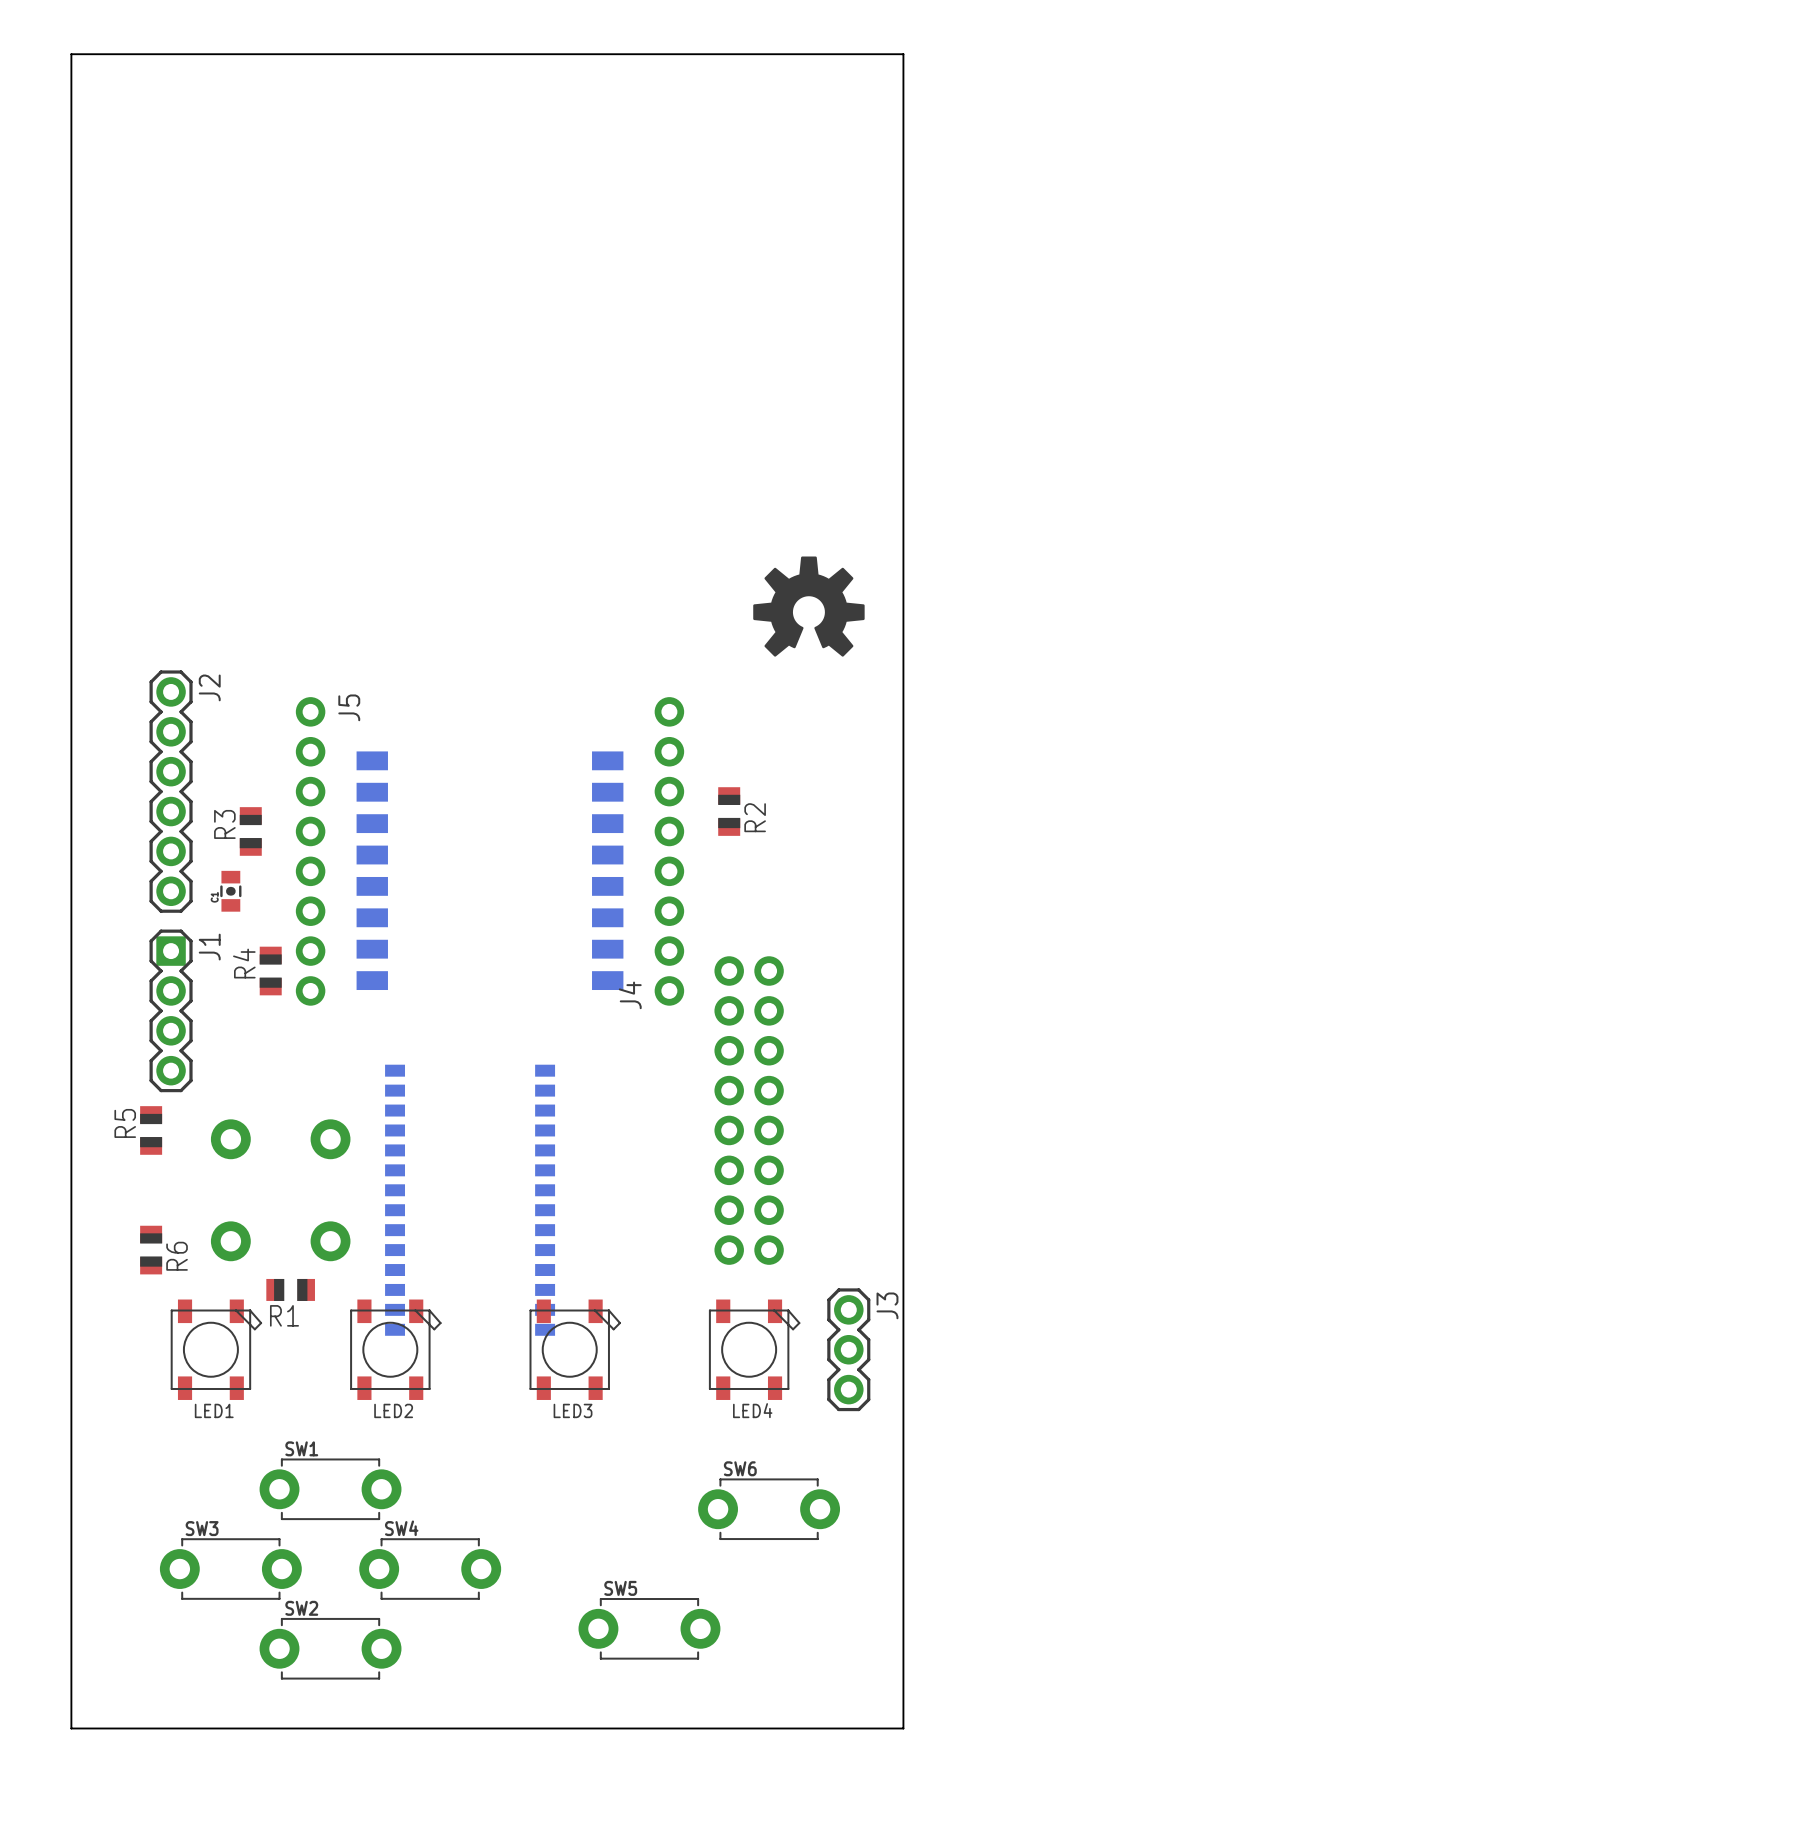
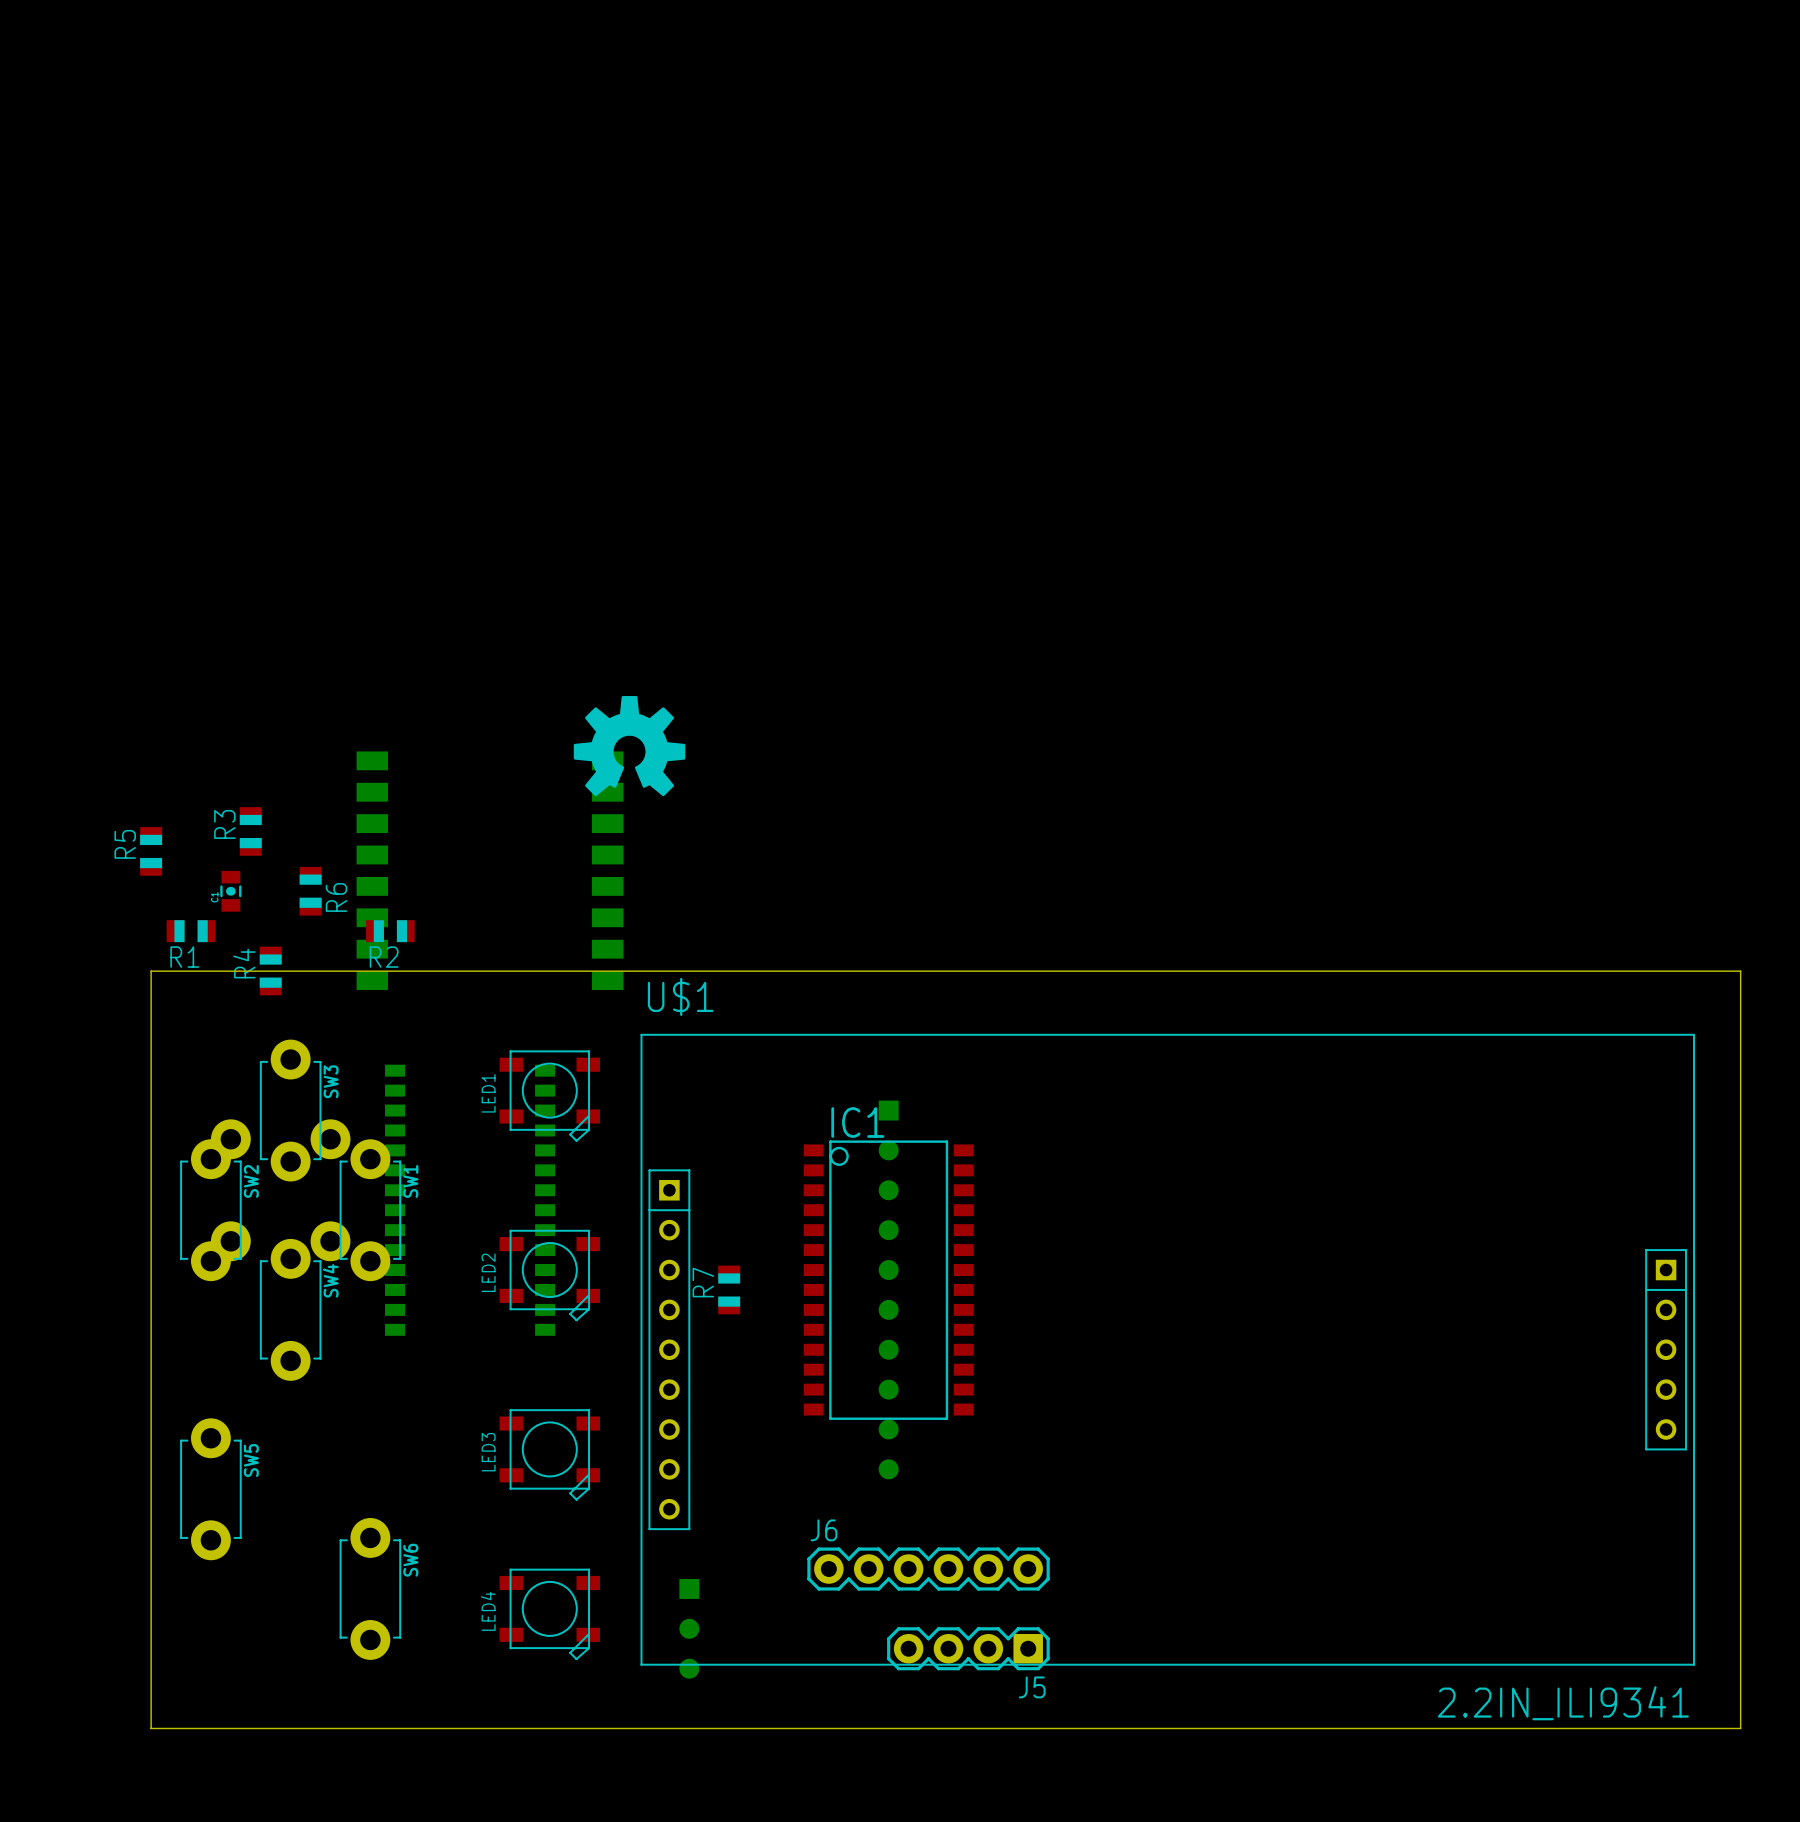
drawing position: (808, 606) -> (629, 746)
J5 footprint: [295, 697, 326, 1006] -> [887, 1627, 1050, 1671]
J5 name position: J5 (349, 707) -> J5 (1032, 1687)
J2: (171, 791) -> none
R2 rotation: 0° (729, 811) -> 90° clockwise (390, 931)
R2 position: (729, 811) -> (390, 931)
J4: (669, 851) -> none
J1: (171, 1010) -> none
part: (729, 1110) -> none
part: (769, 1110) -> none
R5 position: (151, 1130) -> (151, 851)
R6 position: (151, 1250) -> (310, 891)
IC1: none -> (888, 1280)
R1 position: (290, 1289) -> (190, 931)
R7: none -> (729, 1289)
part: none -> (888, 1289)
LED1 rotation: 0° (216, 1349) -> 90° clockwise (549, 1096)
LED1 position: (216, 1349) -> (549, 1096)
LED2 rotation: 0° (395, 1349) -> 90° clockwise (549, 1275)
LED2 position: (395, 1349) -> (549, 1275)
LED3 rotation: 0° (575, 1349) -> 90° clockwise (549, 1454)
LED3 position: (575, 1349) -> (549, 1454)
LED4 rotation: 0° (754, 1349) -> 90° clockwise (549, 1614)
LED4 position: (754, 1349) -> (549, 1614)
J3: (848, 1349) -> none
U$1: none -> 2.2IN_ILI9341 (1167, 1349)
SW1 rotation: 0° (330, 1489) -> 90° clockwise (370, 1210)
SW1 position: (330, 1489) -> (370, 1210)
SW6 rotation: 0° (769, 1509) -> 90° clockwise (370, 1588)
SW6 position: (769, 1509) -> (370, 1588)
SW3 rotation: 0° (230, 1569) -> 90° clockwise (290, 1110)
SW3 position: (230, 1569) -> (290, 1110)
SW4 rotation: 0° (430, 1569) -> 90° clockwise (290, 1309)
SW4 position: (430, 1569) -> (290, 1309)
J6: none -> (928, 1569)
SW5 rotation: 0° (649, 1628) -> 90° clockwise (210, 1489)
SW5 position: (649, 1628) -> (210, 1489)
part: none -> (689, 1628)
SW2 rotation: 0° (330, 1648) -> 90° clockwise (210, 1210)
SW2 position: (330, 1648) -> (210, 1210)
board edge: (151, 1728) (71, 1728) (71, 54) (903, 54) (903, 1728) -> (151, 1728) (151, 971) (1740, 971) (1740, 1728) (903, 1728)

